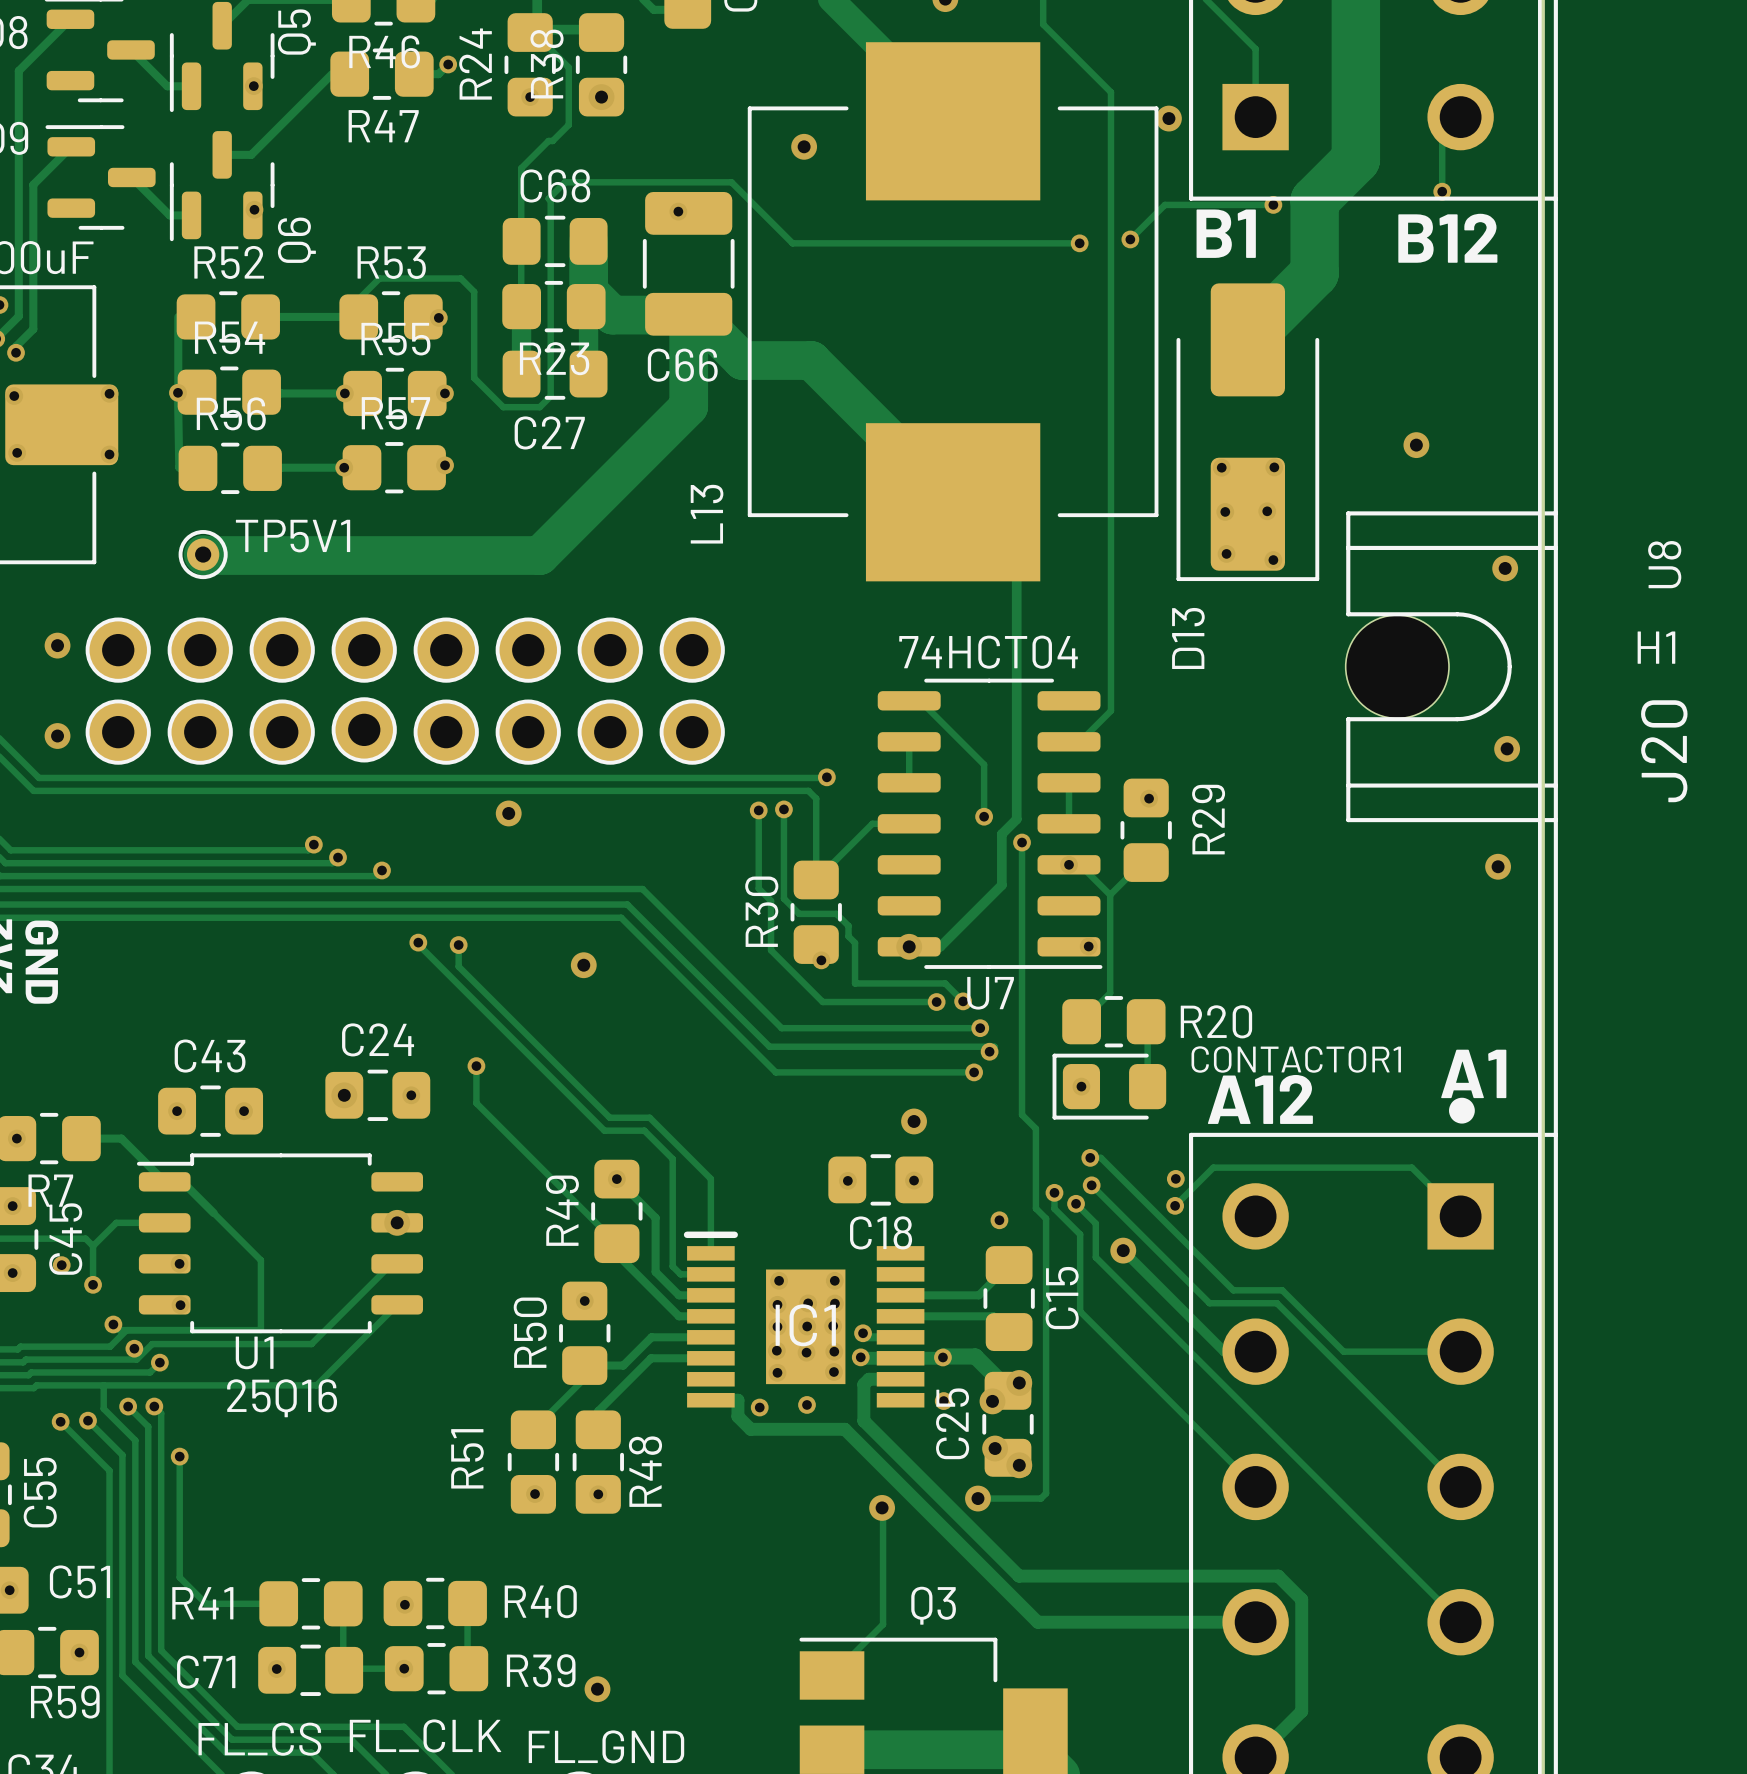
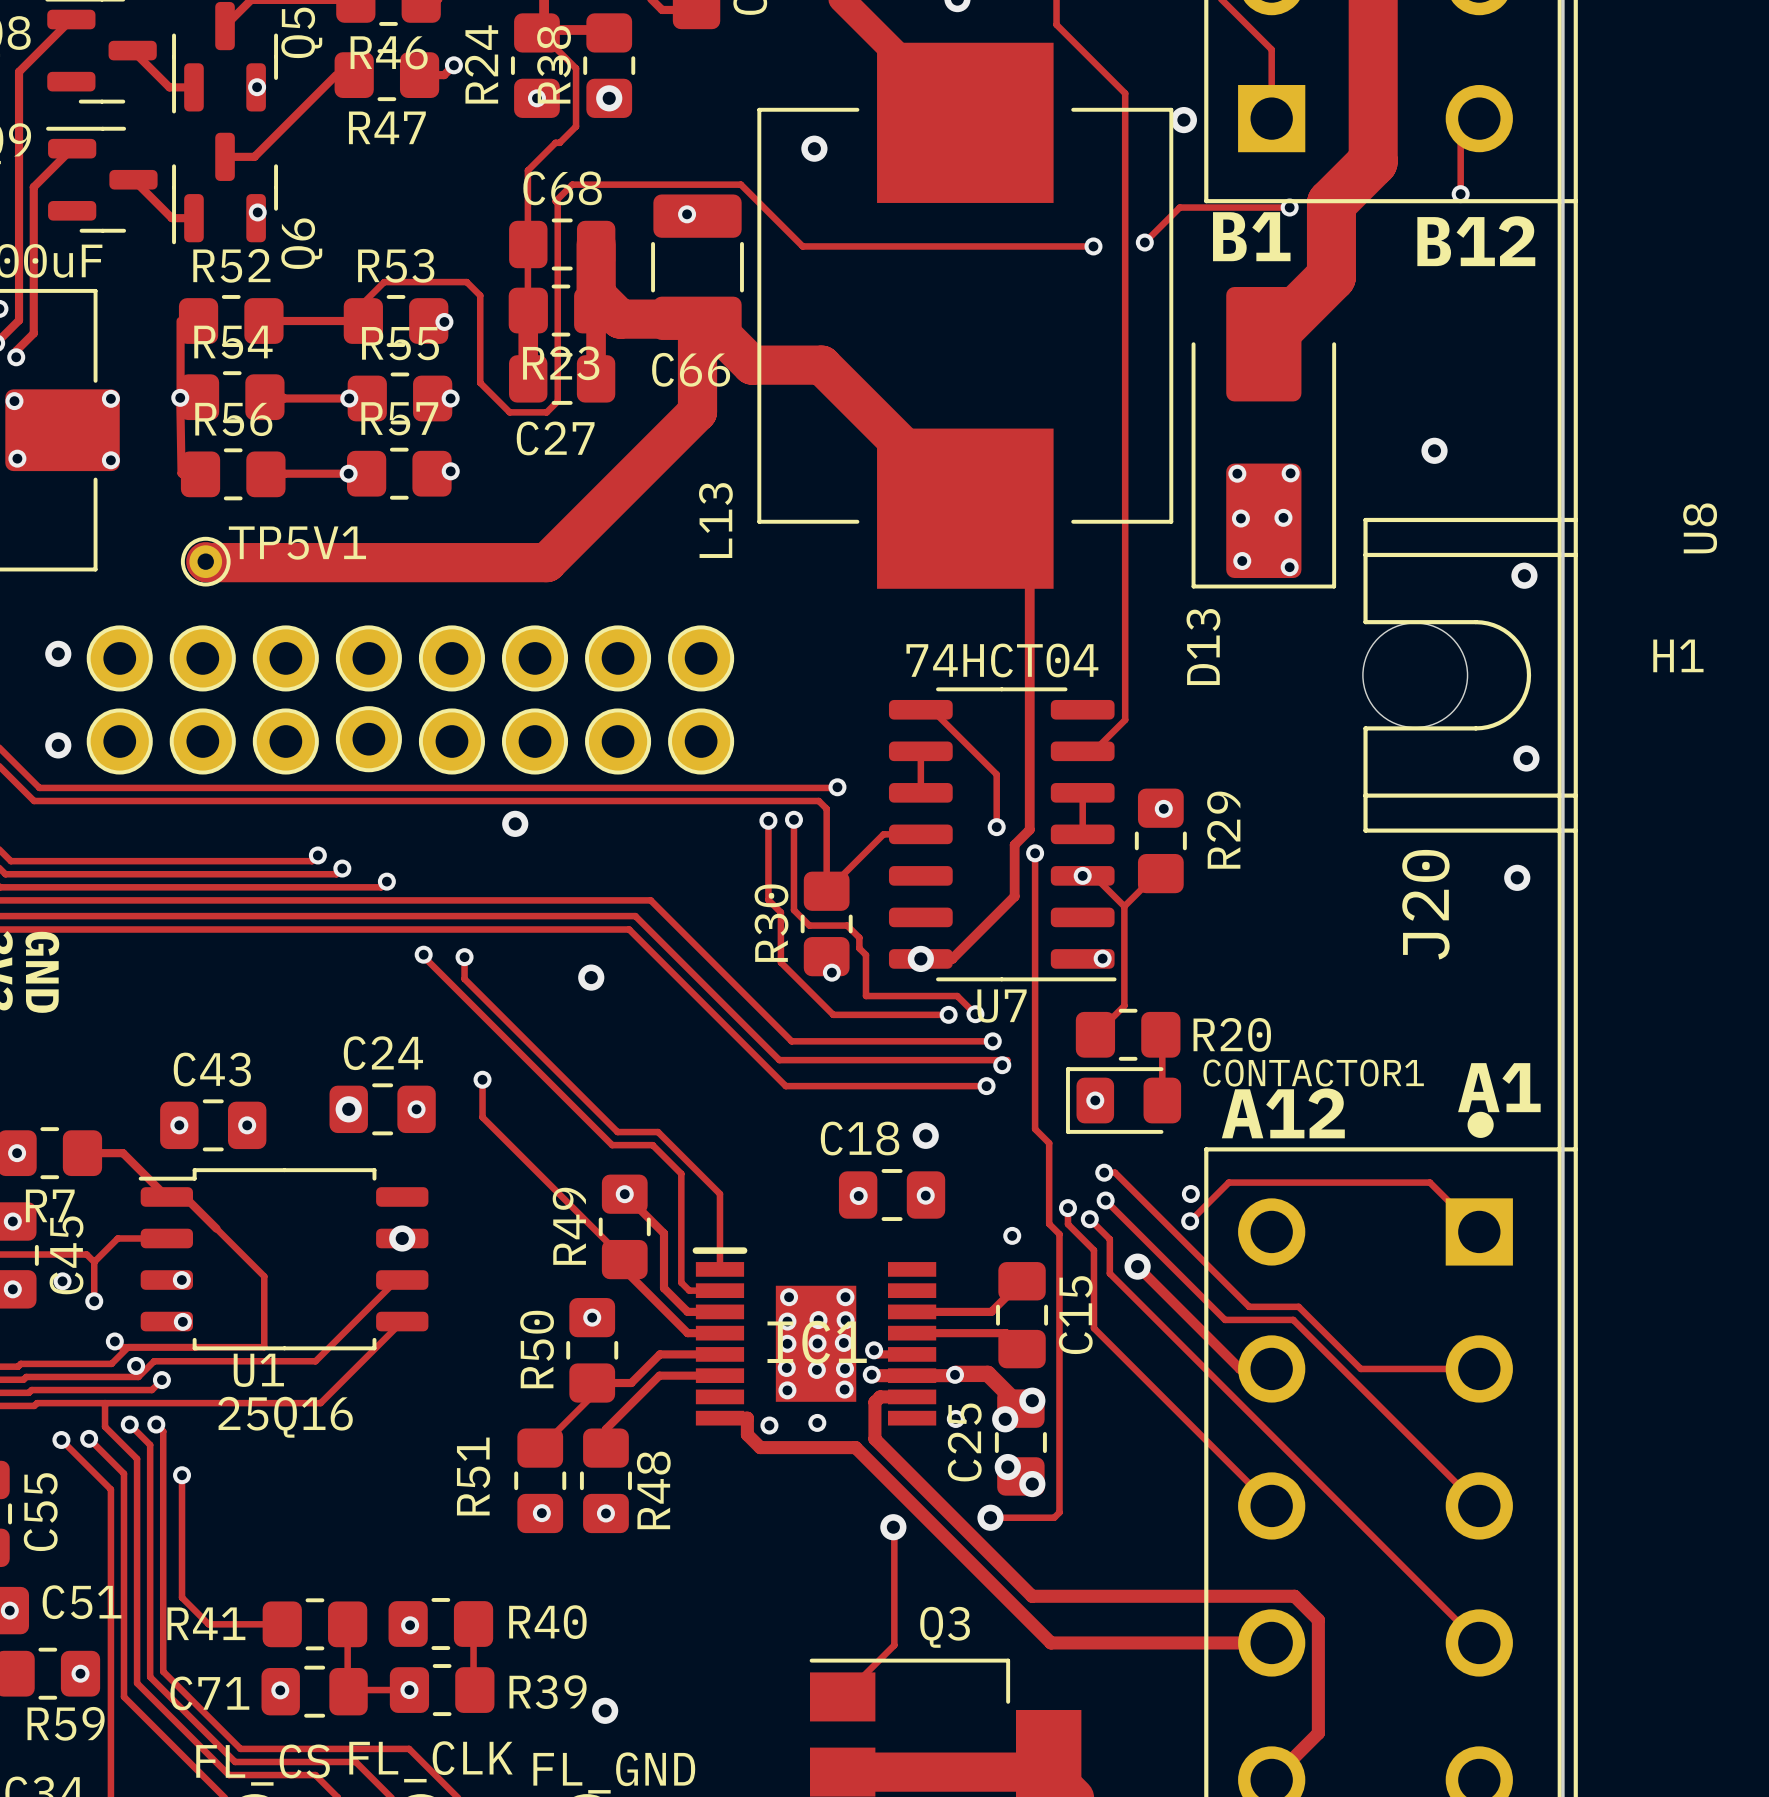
U8 name position: U8 (1664, 564) -> U8 (1700, 528)
J20 name position: J20 (1664, 751) -> J20 (1425, 904)
C18 name position: C18 (881, 1232) -> C18 (860, 1138)

